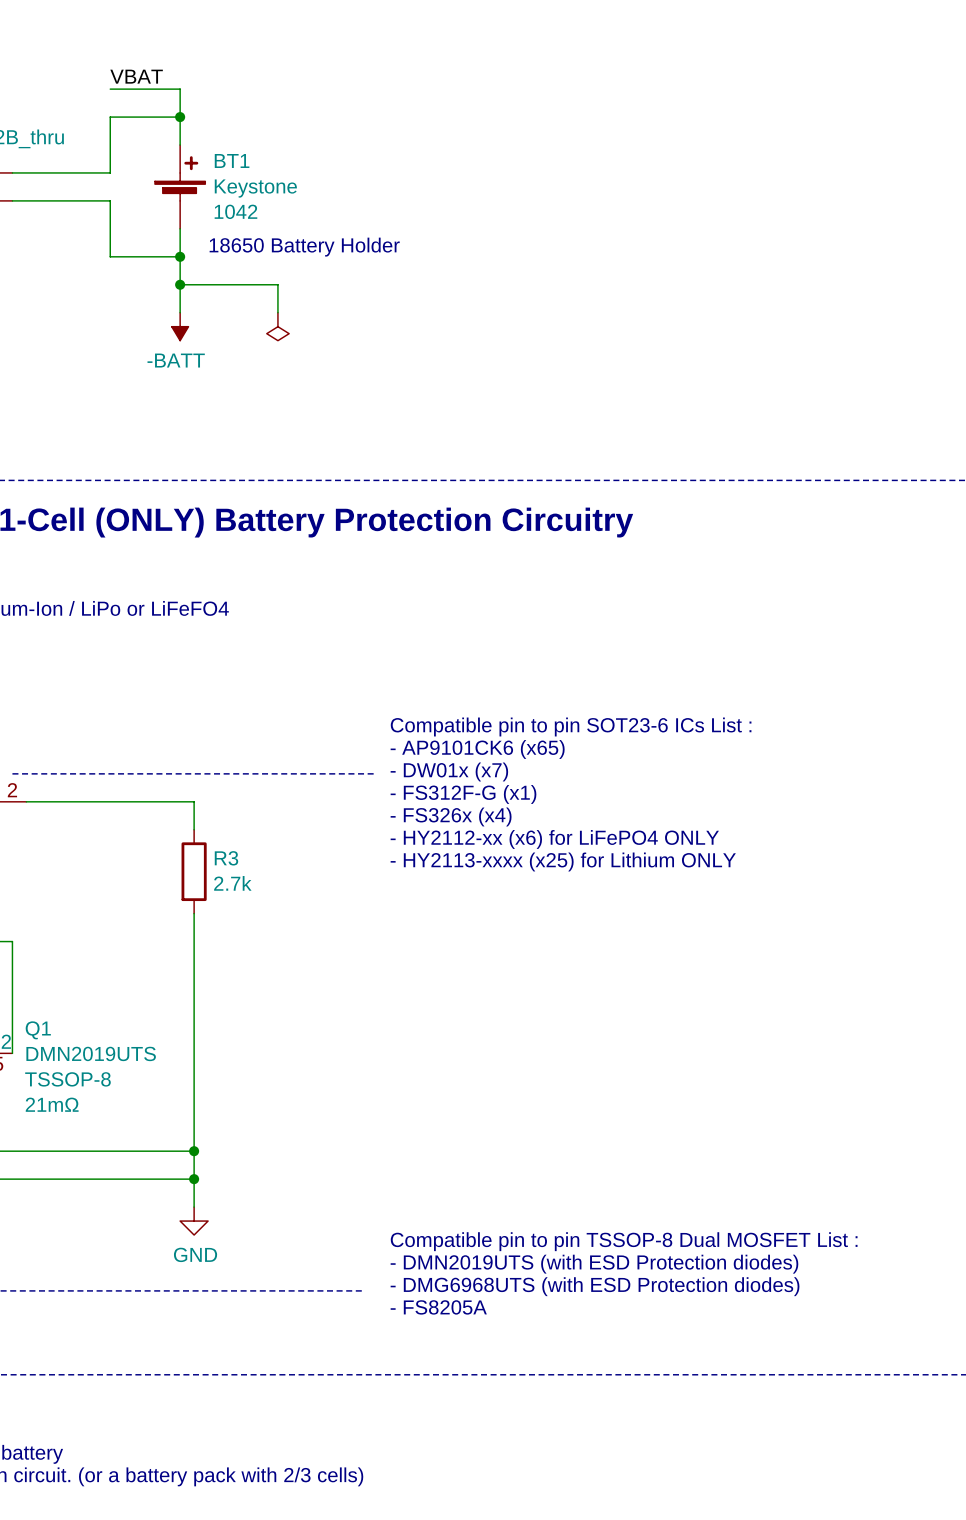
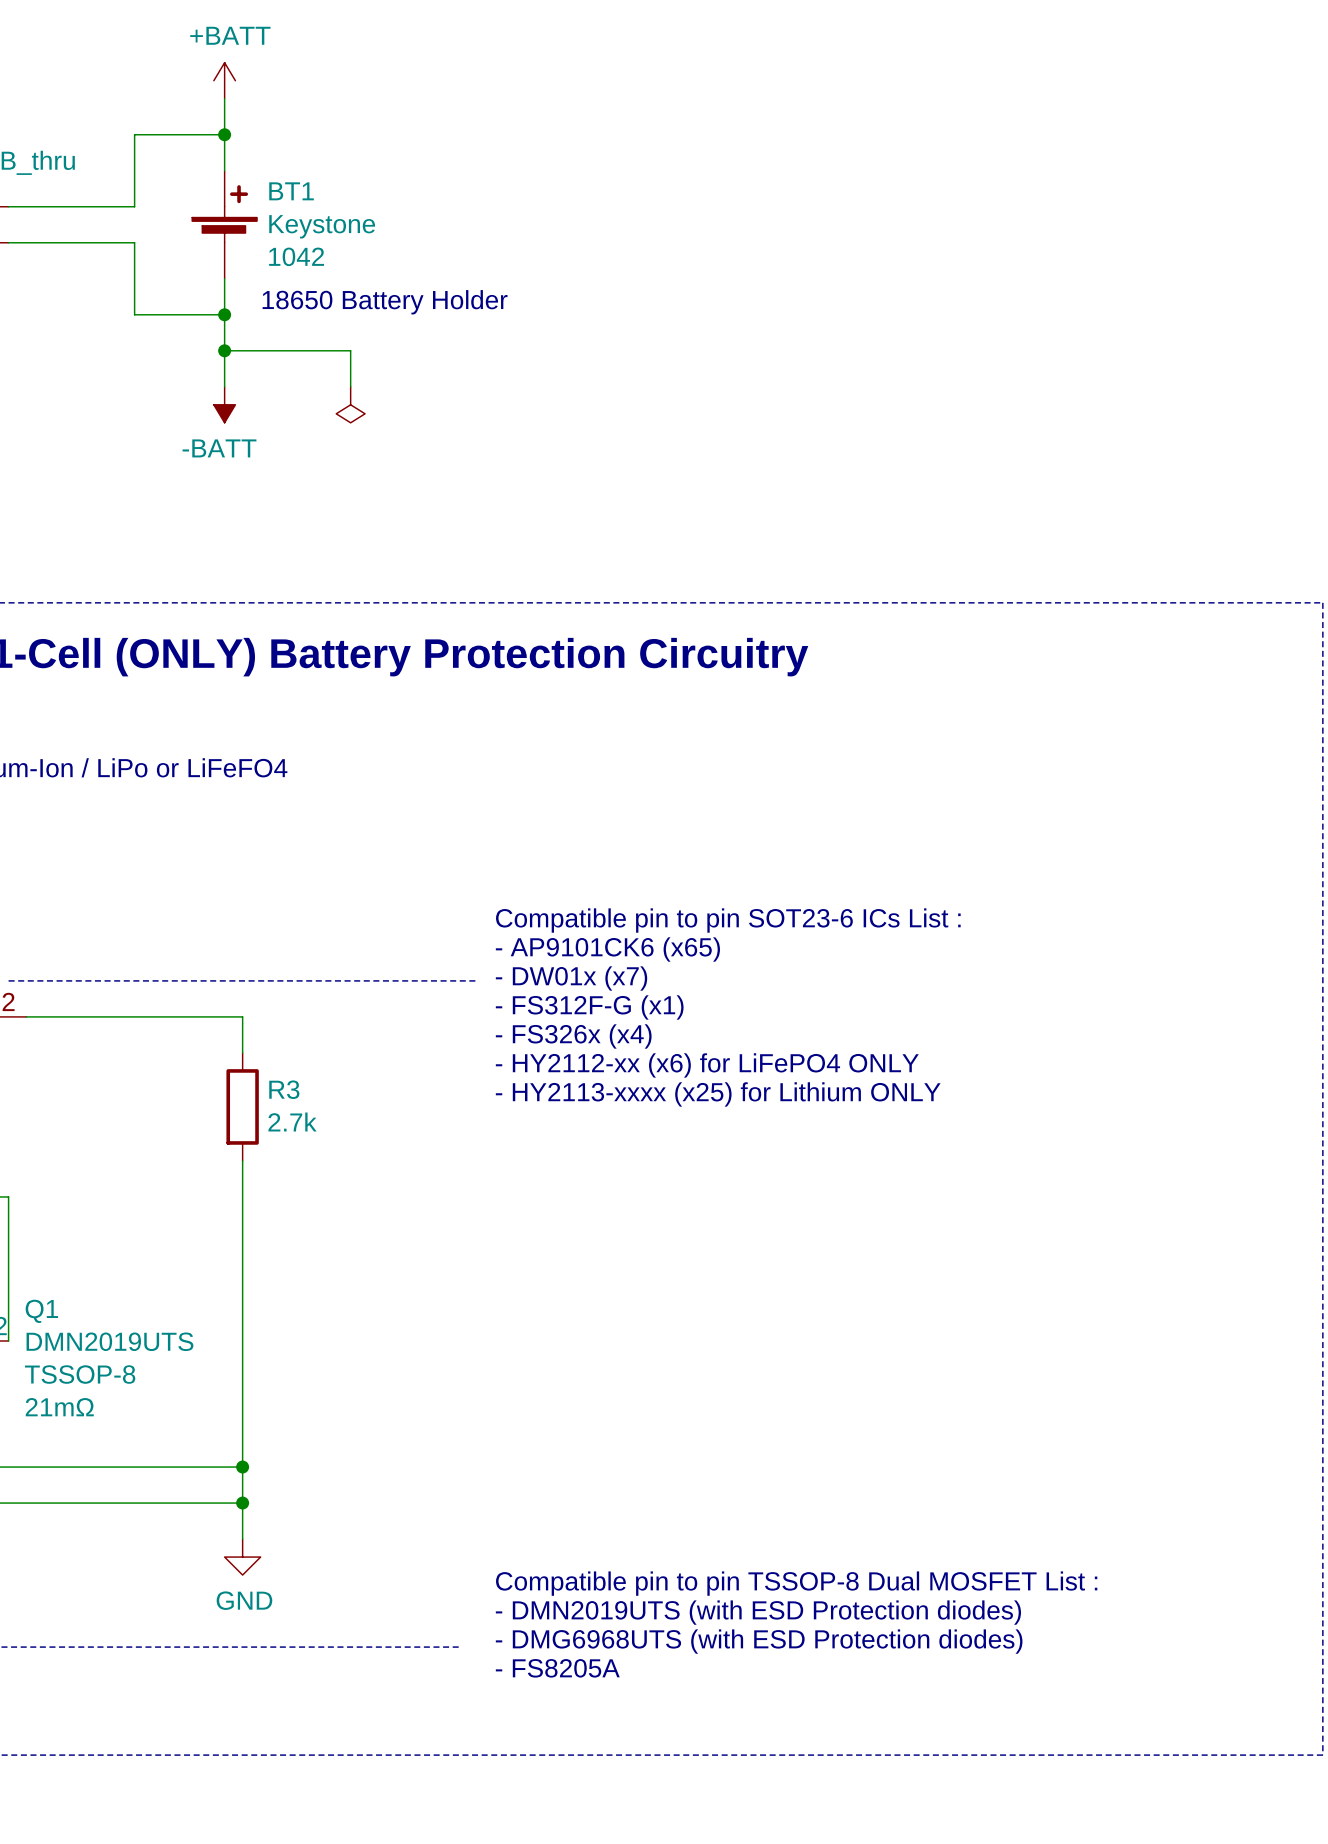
power symbol: none -> +BATT (224, 80)
label: VBAT (136, 76) -> none
wire: (110, 89) (180, 89) -> none

